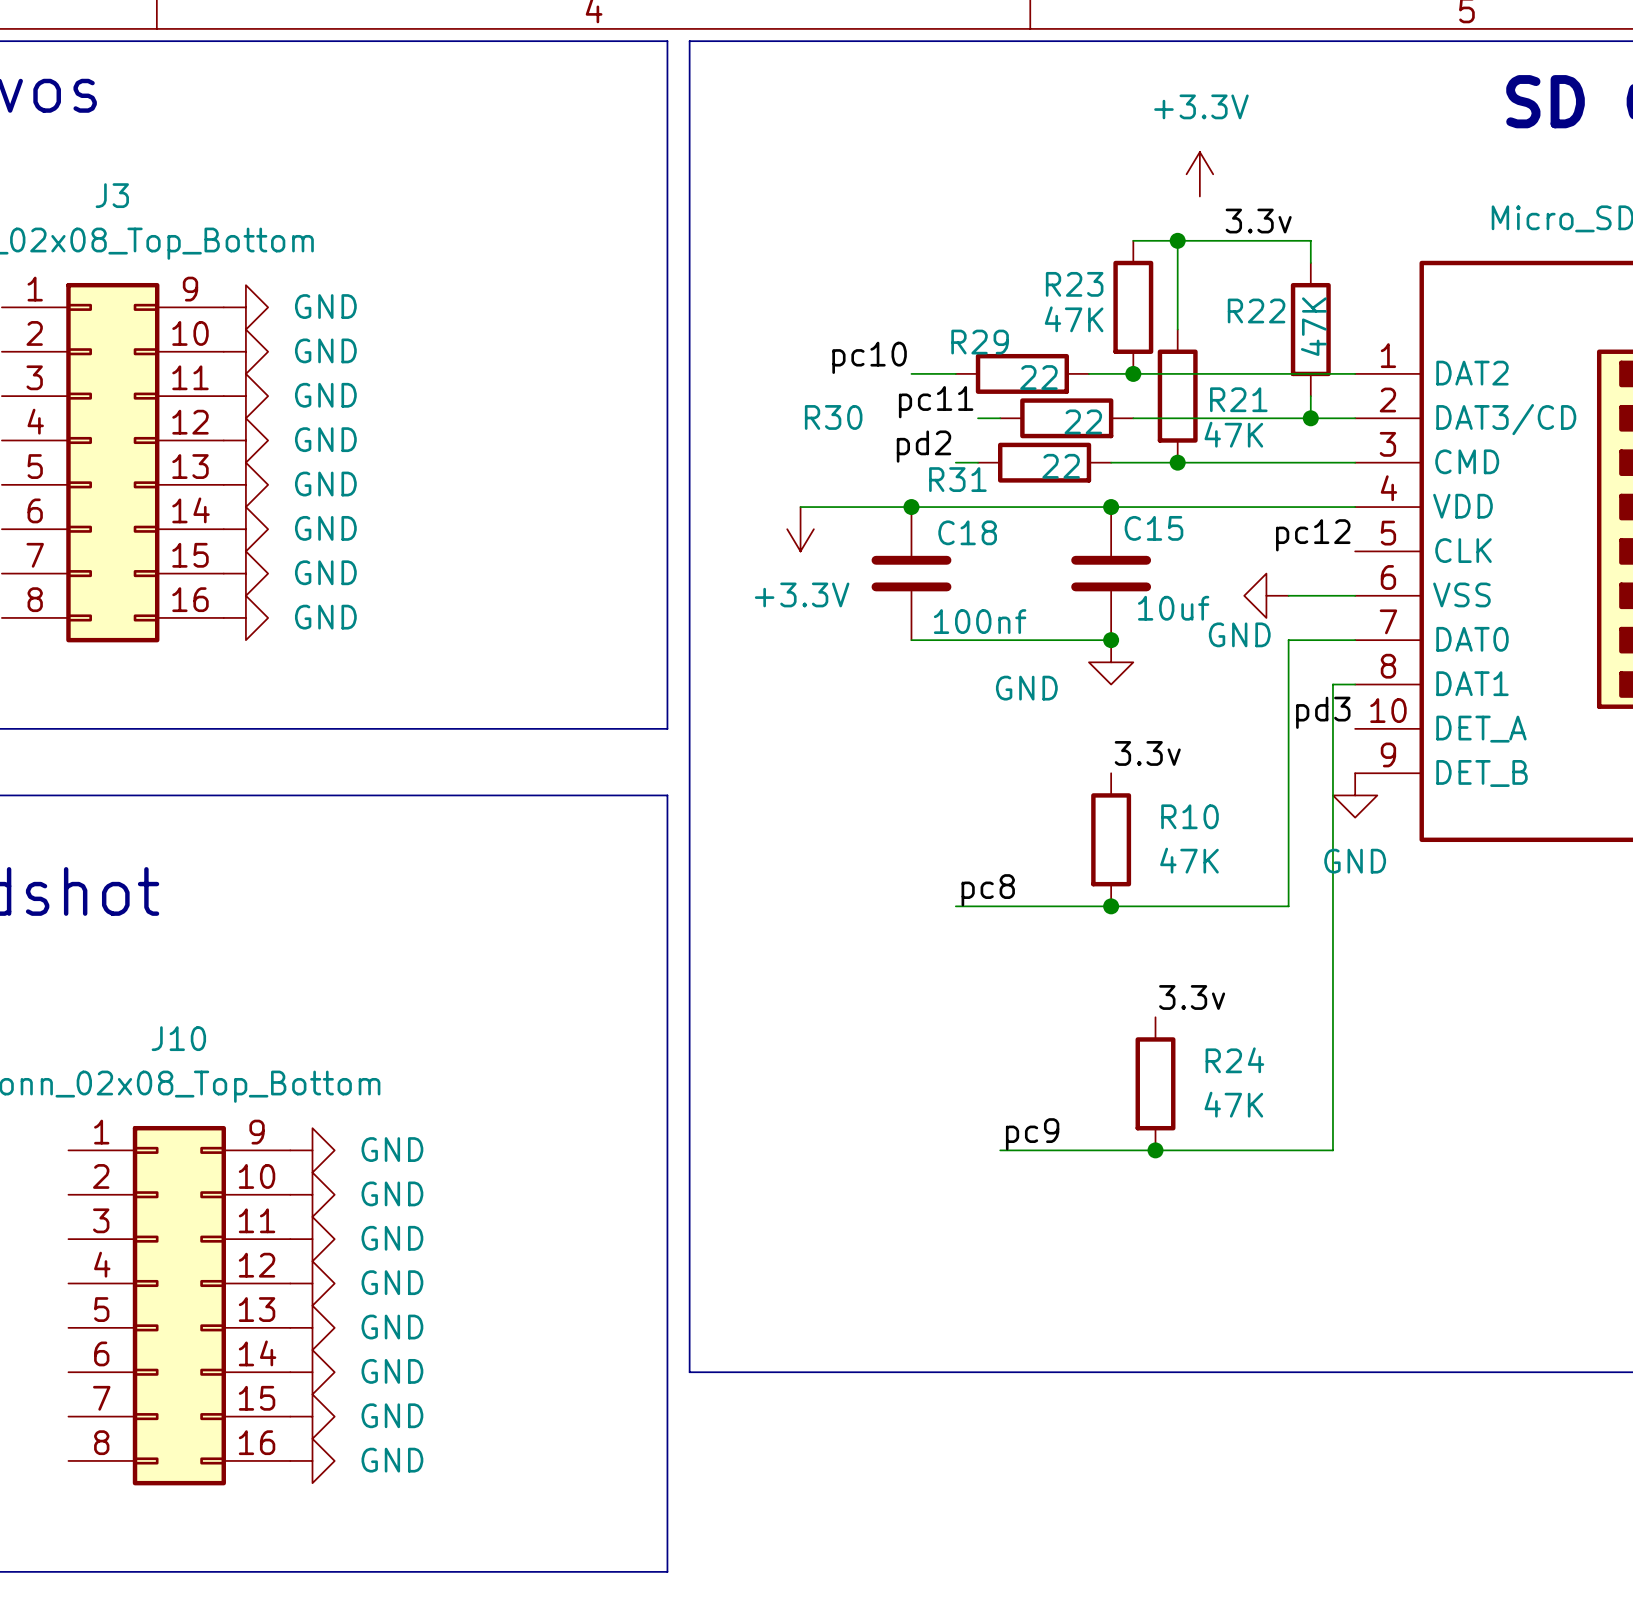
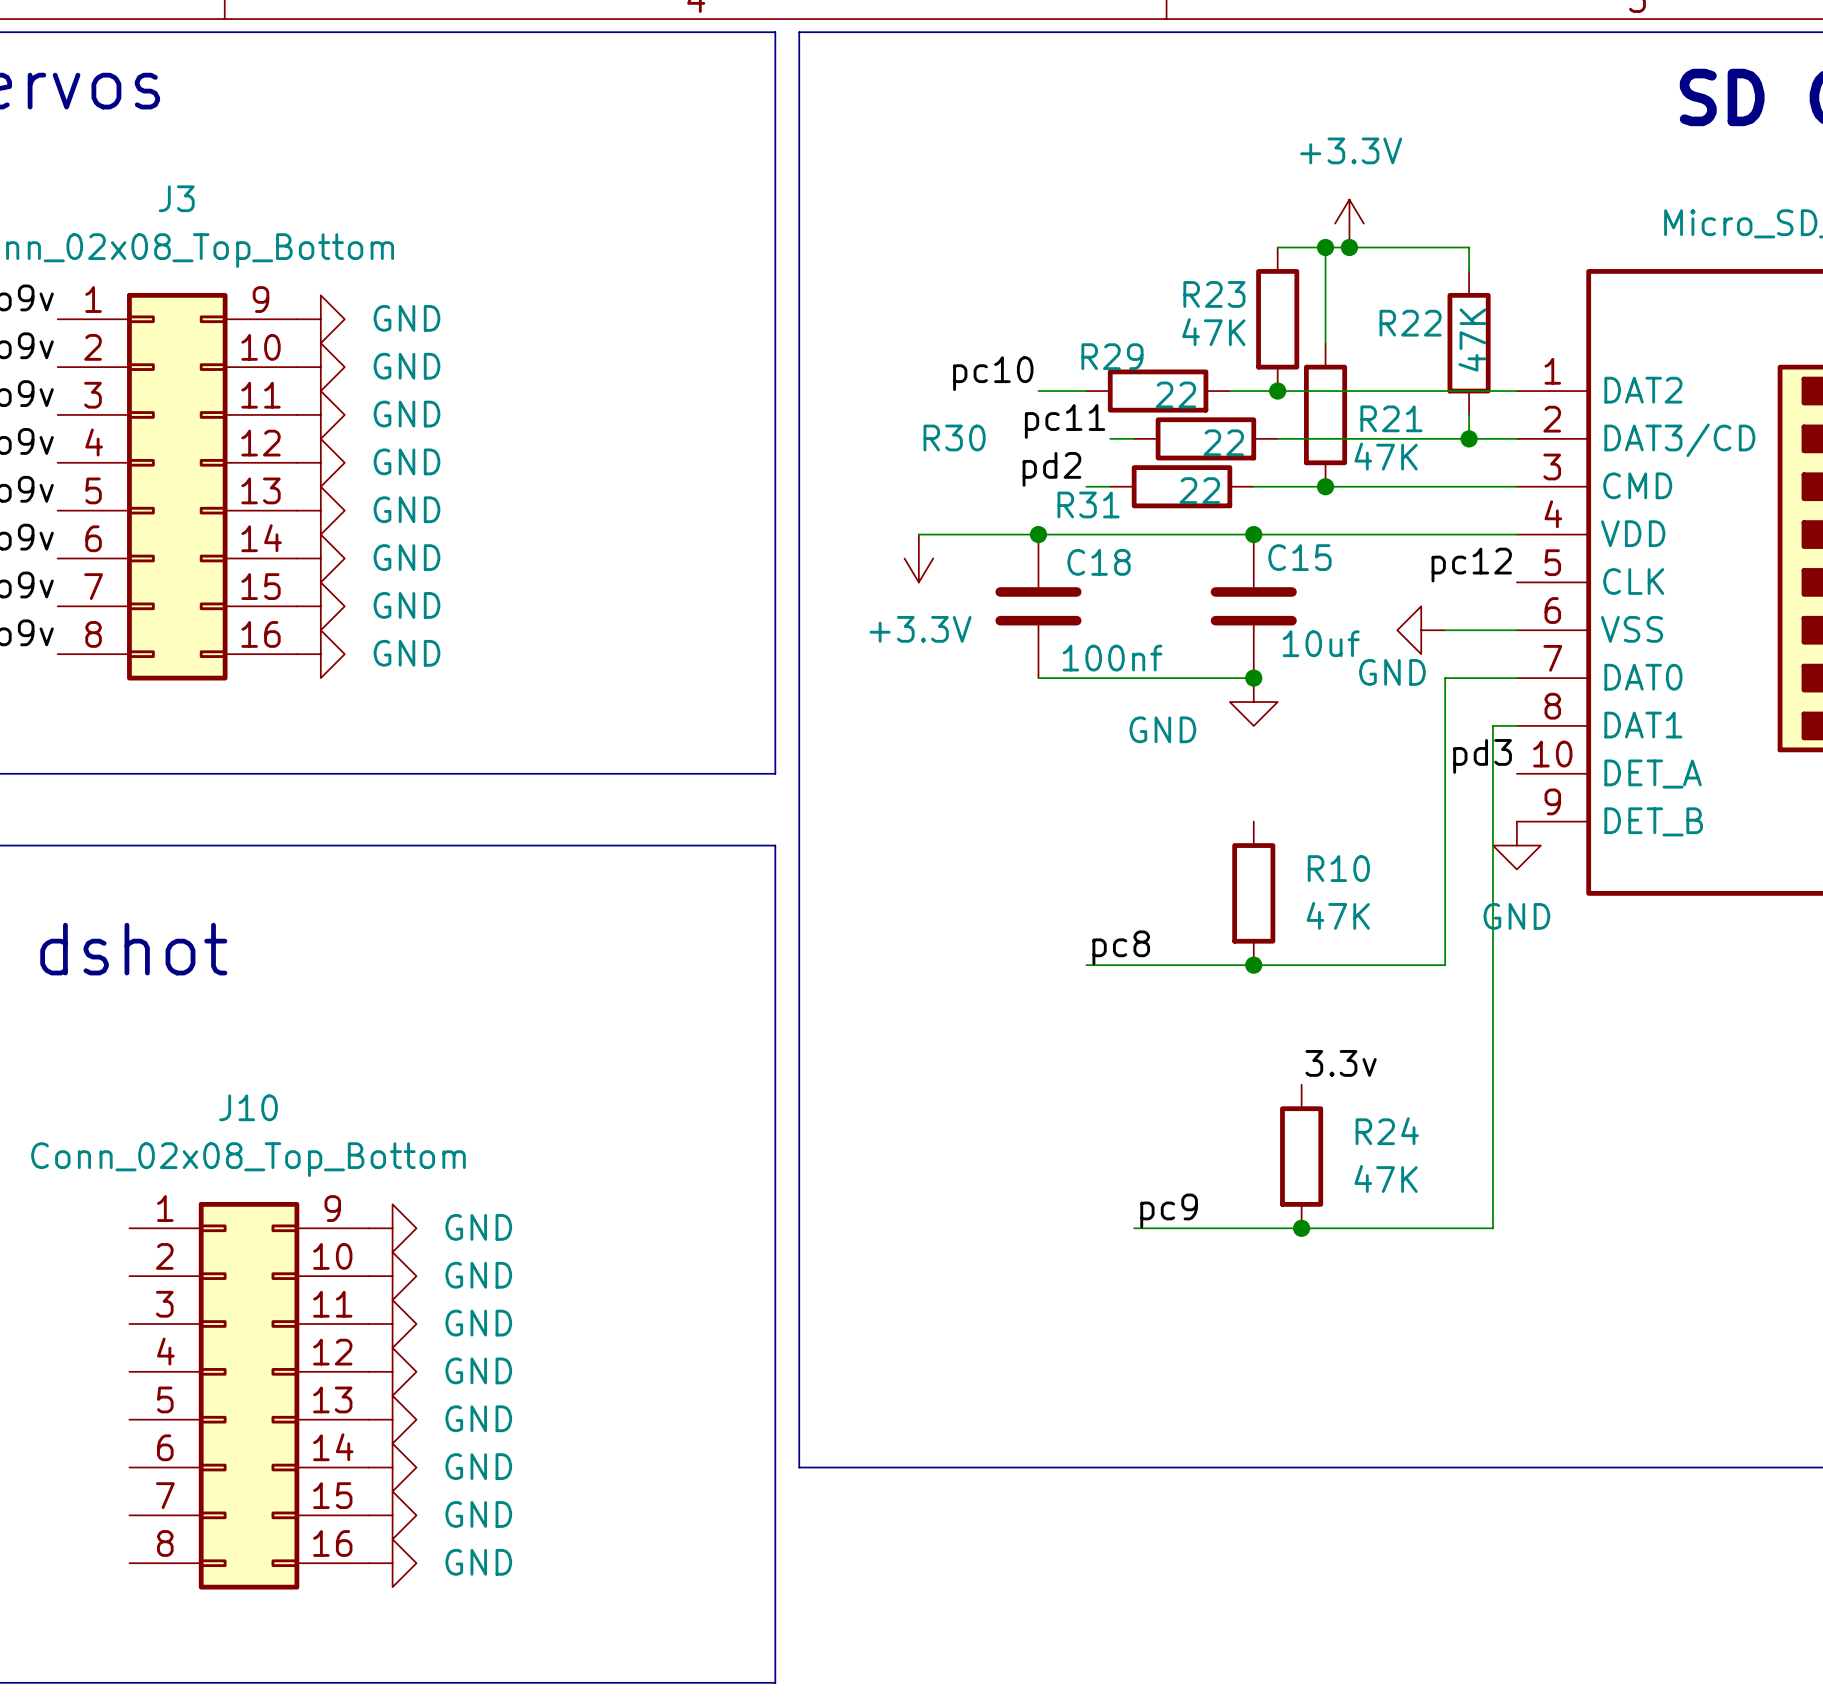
power symbol position: +3.3V (1199, 174) -> +3.3V (1349, 223)
label: 3.3v (1258, 221) -> none
junction: none -> (1349, 247)
label: 3.3v (1147, 753) -> none

